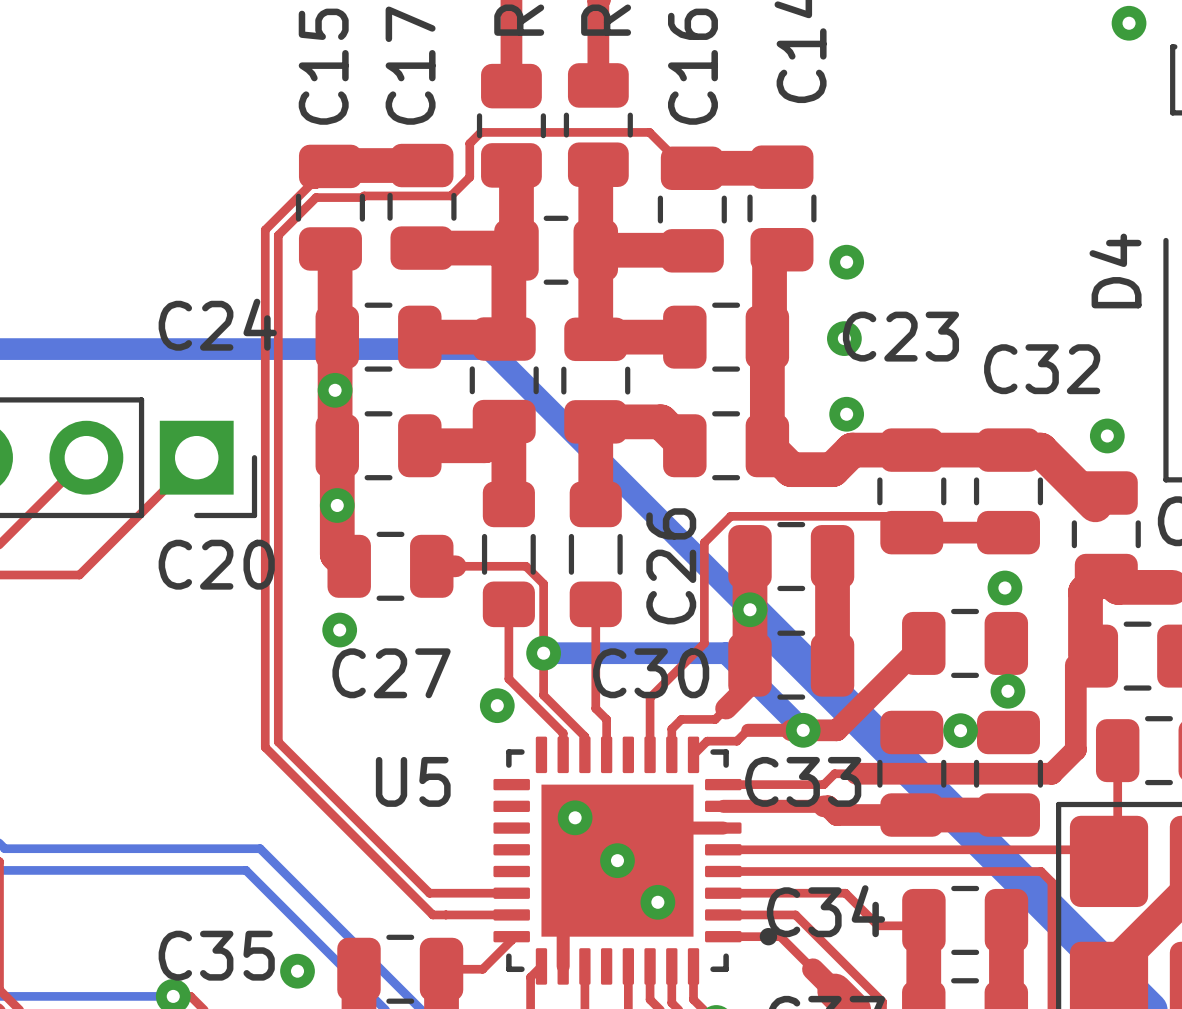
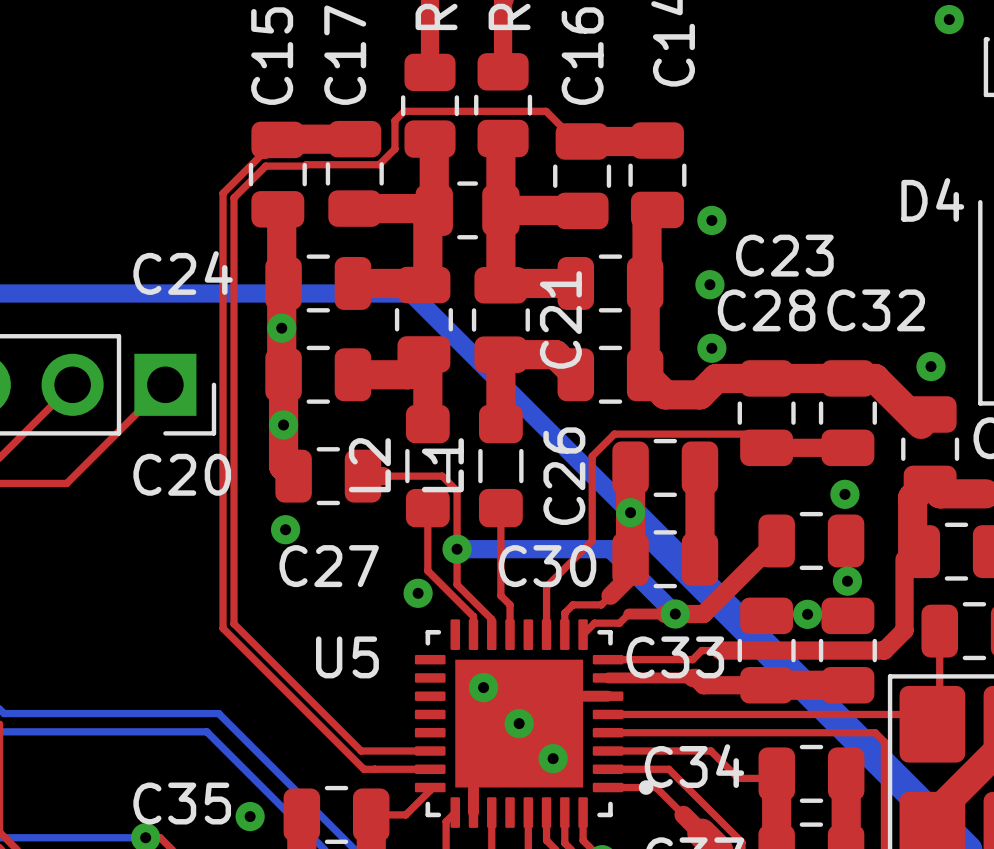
D4 name rotation: 0° (1115, 270) -> 90° clockwise (932, 199)
C23 name position: C23 (900, 336) -> C23 (784, 255)
C28 name: none -> C28 (766, 310)
C21 name: none -> C21 (560, 319)
L2 name: none -> L2 (369, 465)
L1 name: none -> L1 (442, 465)

